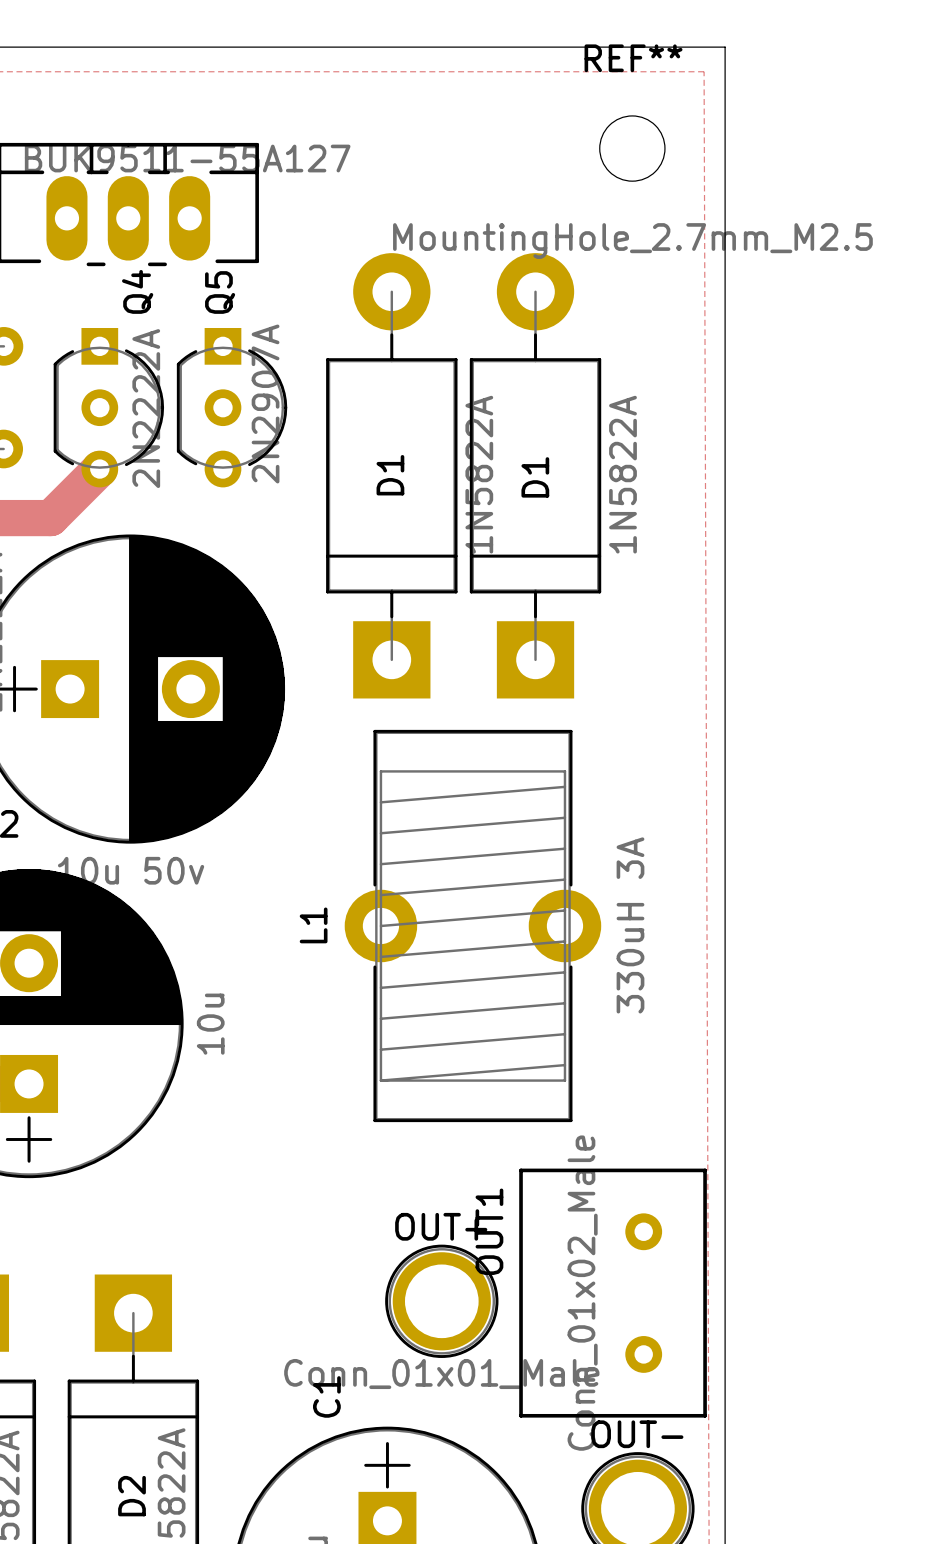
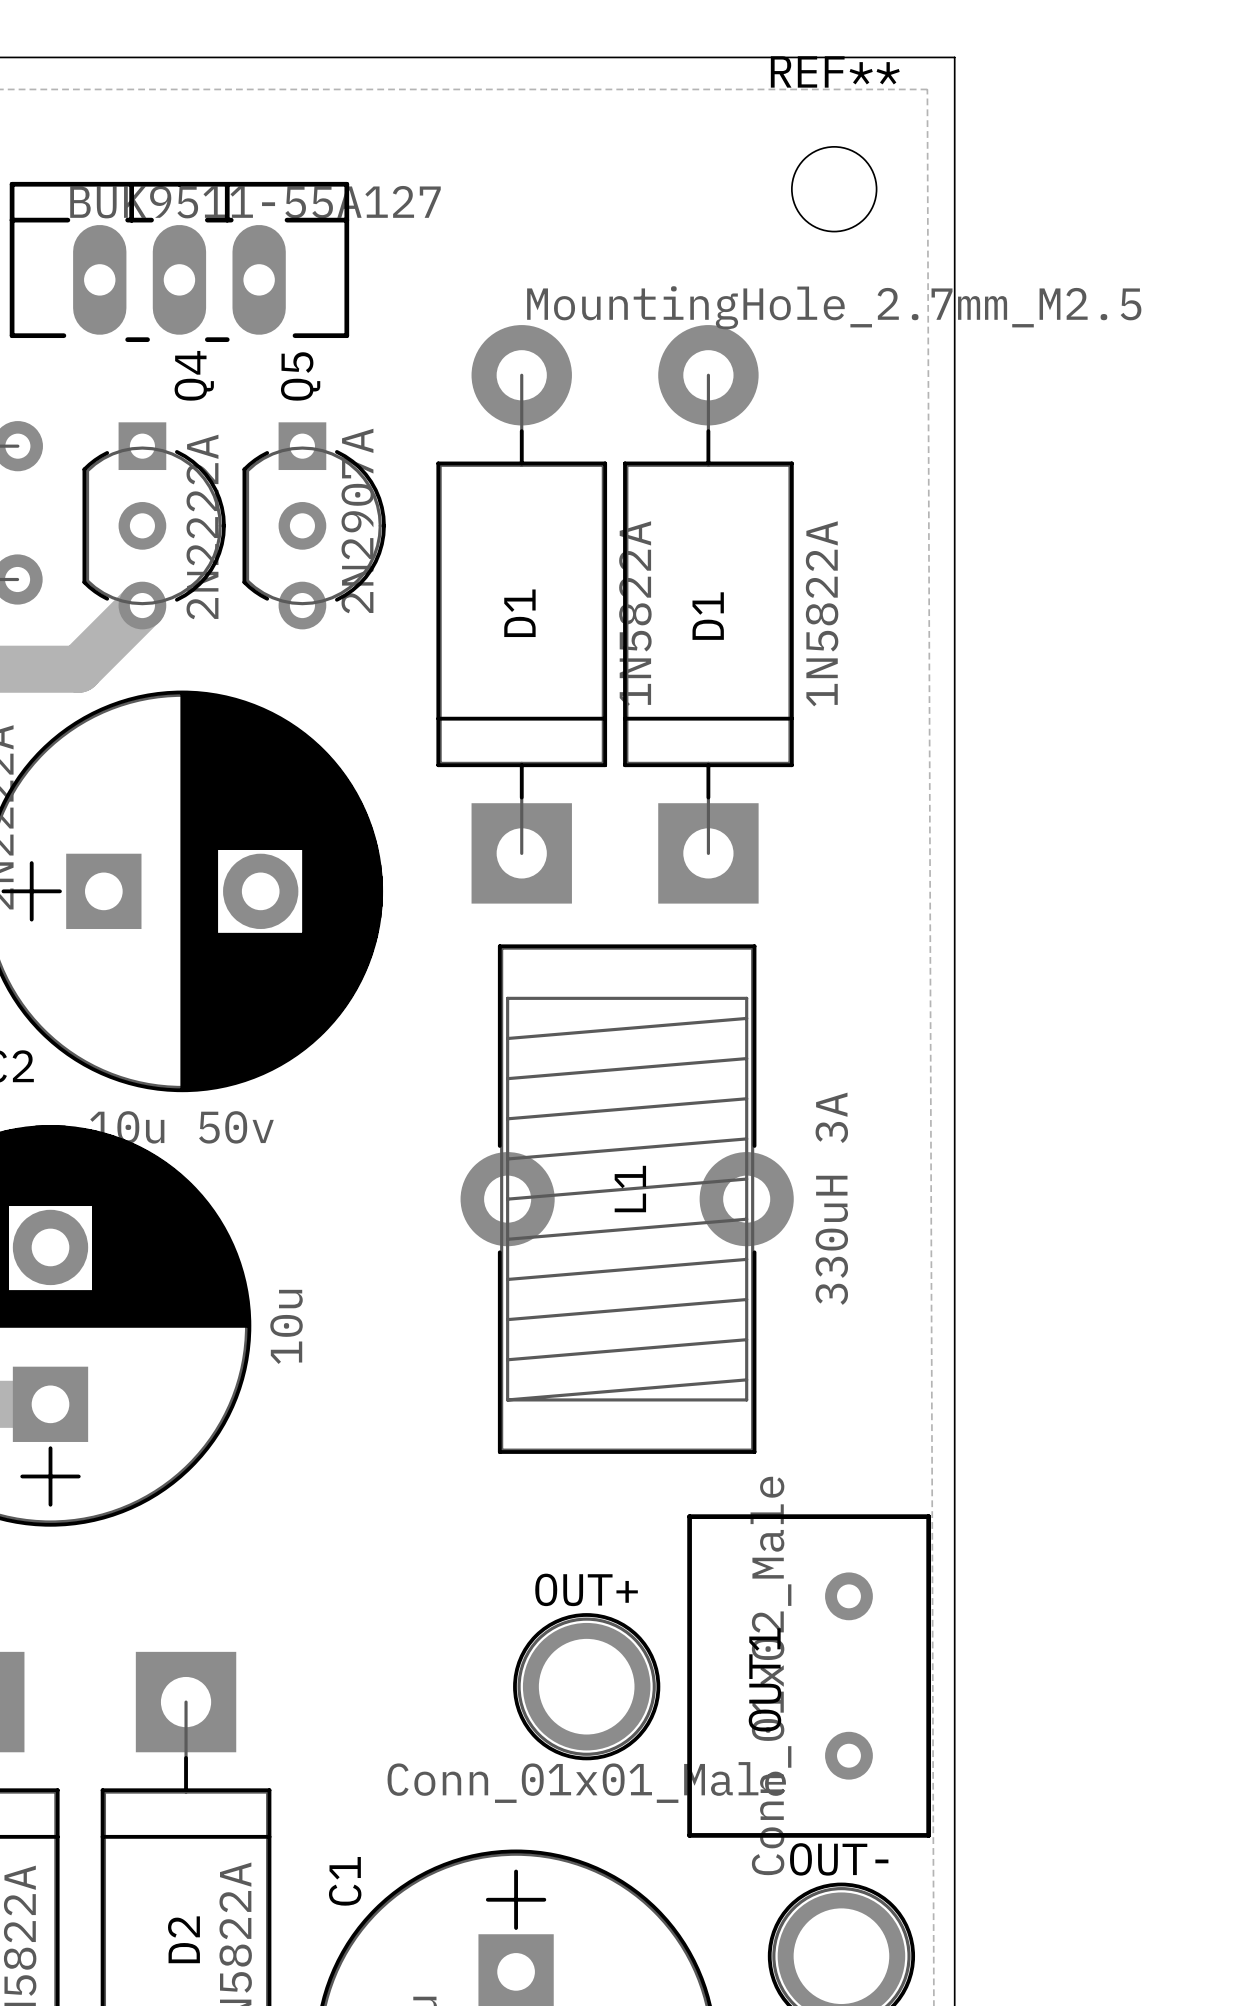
L1 name position: L1 (313, 925) -> L1 (630, 1189)
OUT1 name position: OUT1 (489, 1231) -> OUT1 (764, 1679)
C1 name position: C1 (326, 1396) -> C1 (345, 1881)

